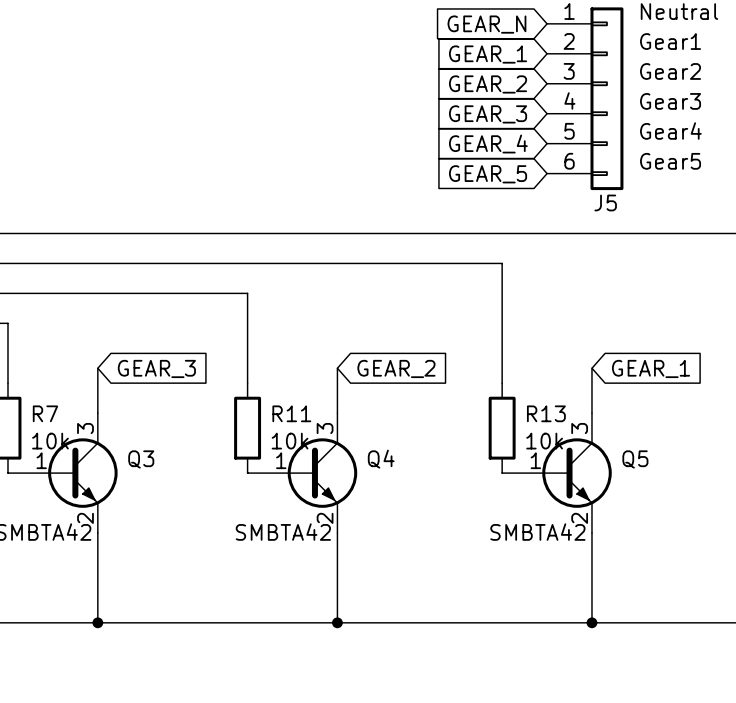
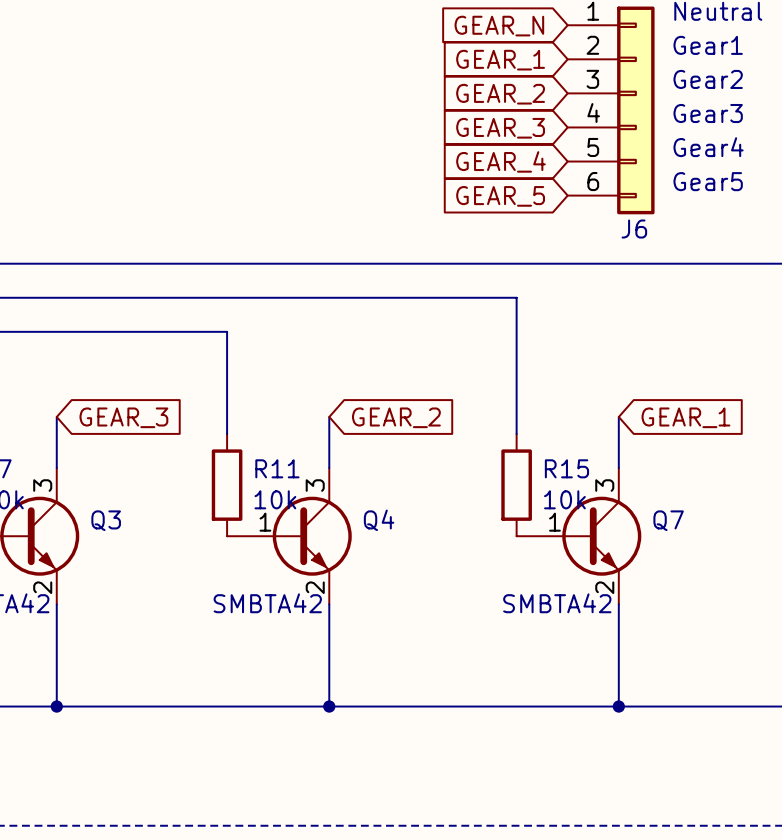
J5 name: J5 (605, 202) -> J6 (634, 229)
R13 name: R13 (546, 413) -> R15 (566, 468)
Q5 name: Q5 (635, 459) -> Q7 (668, 520)

